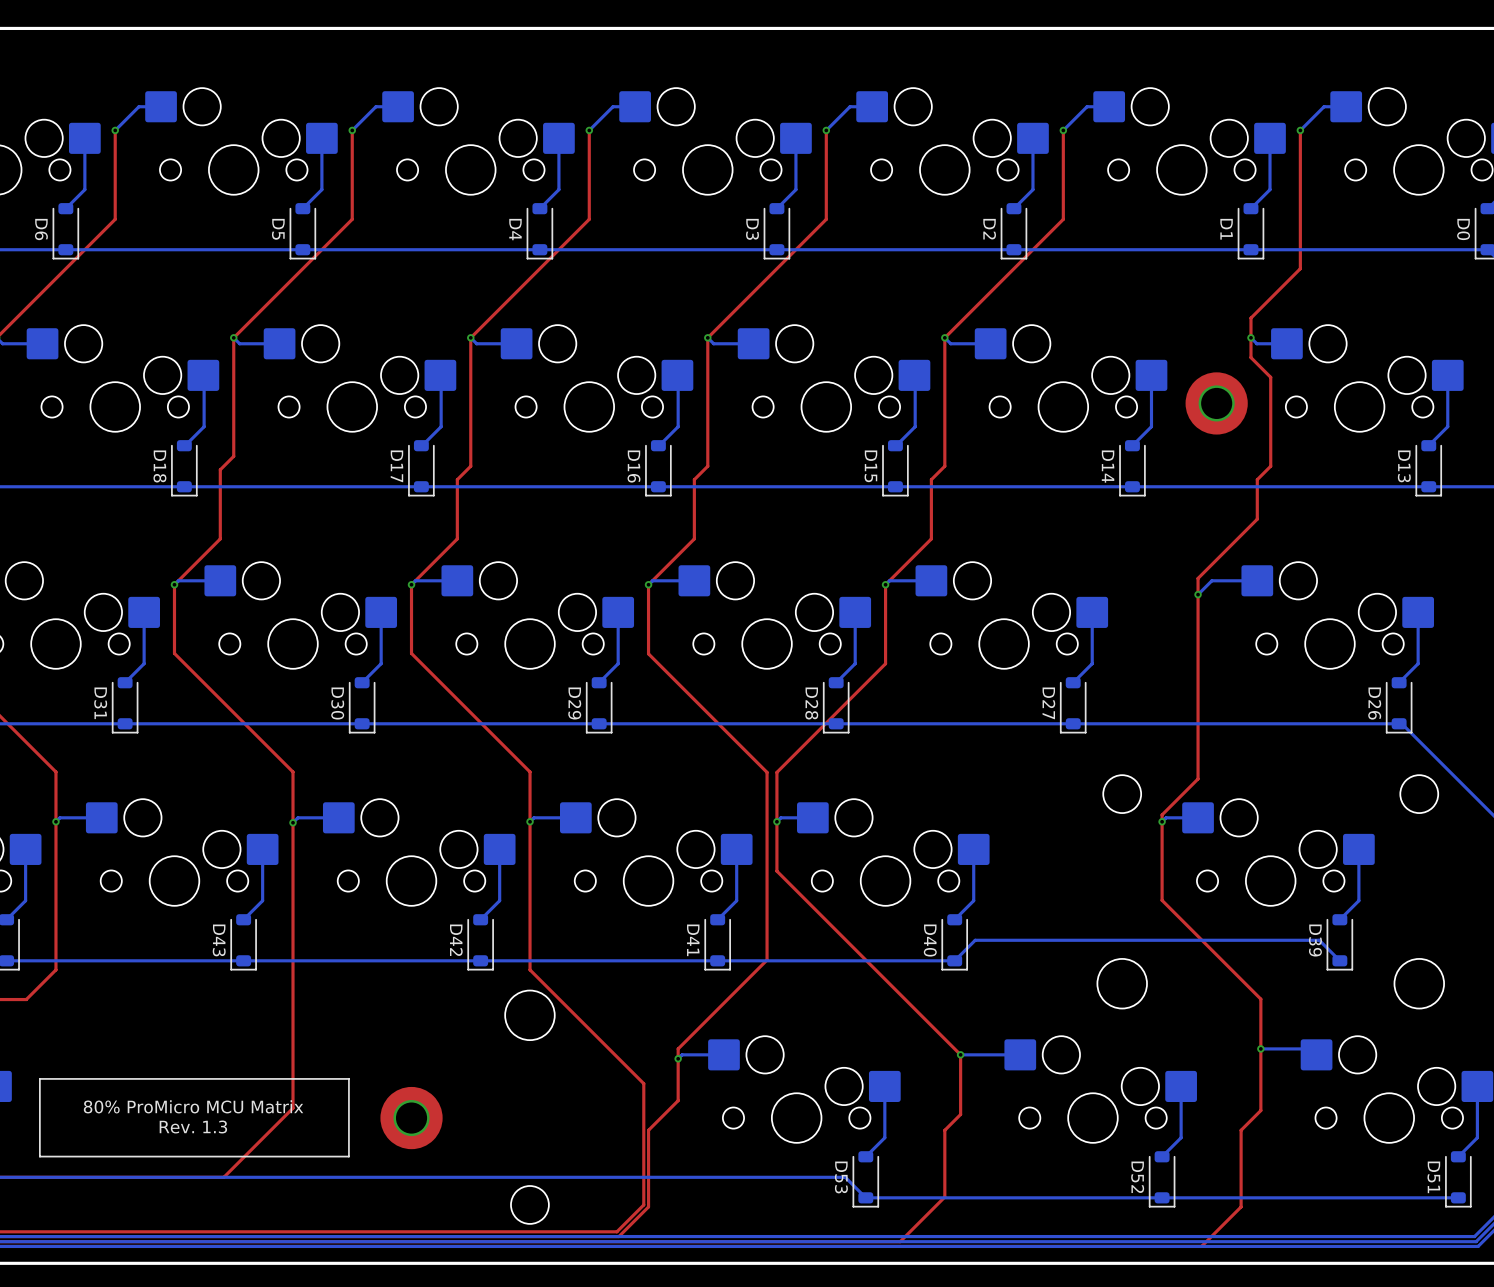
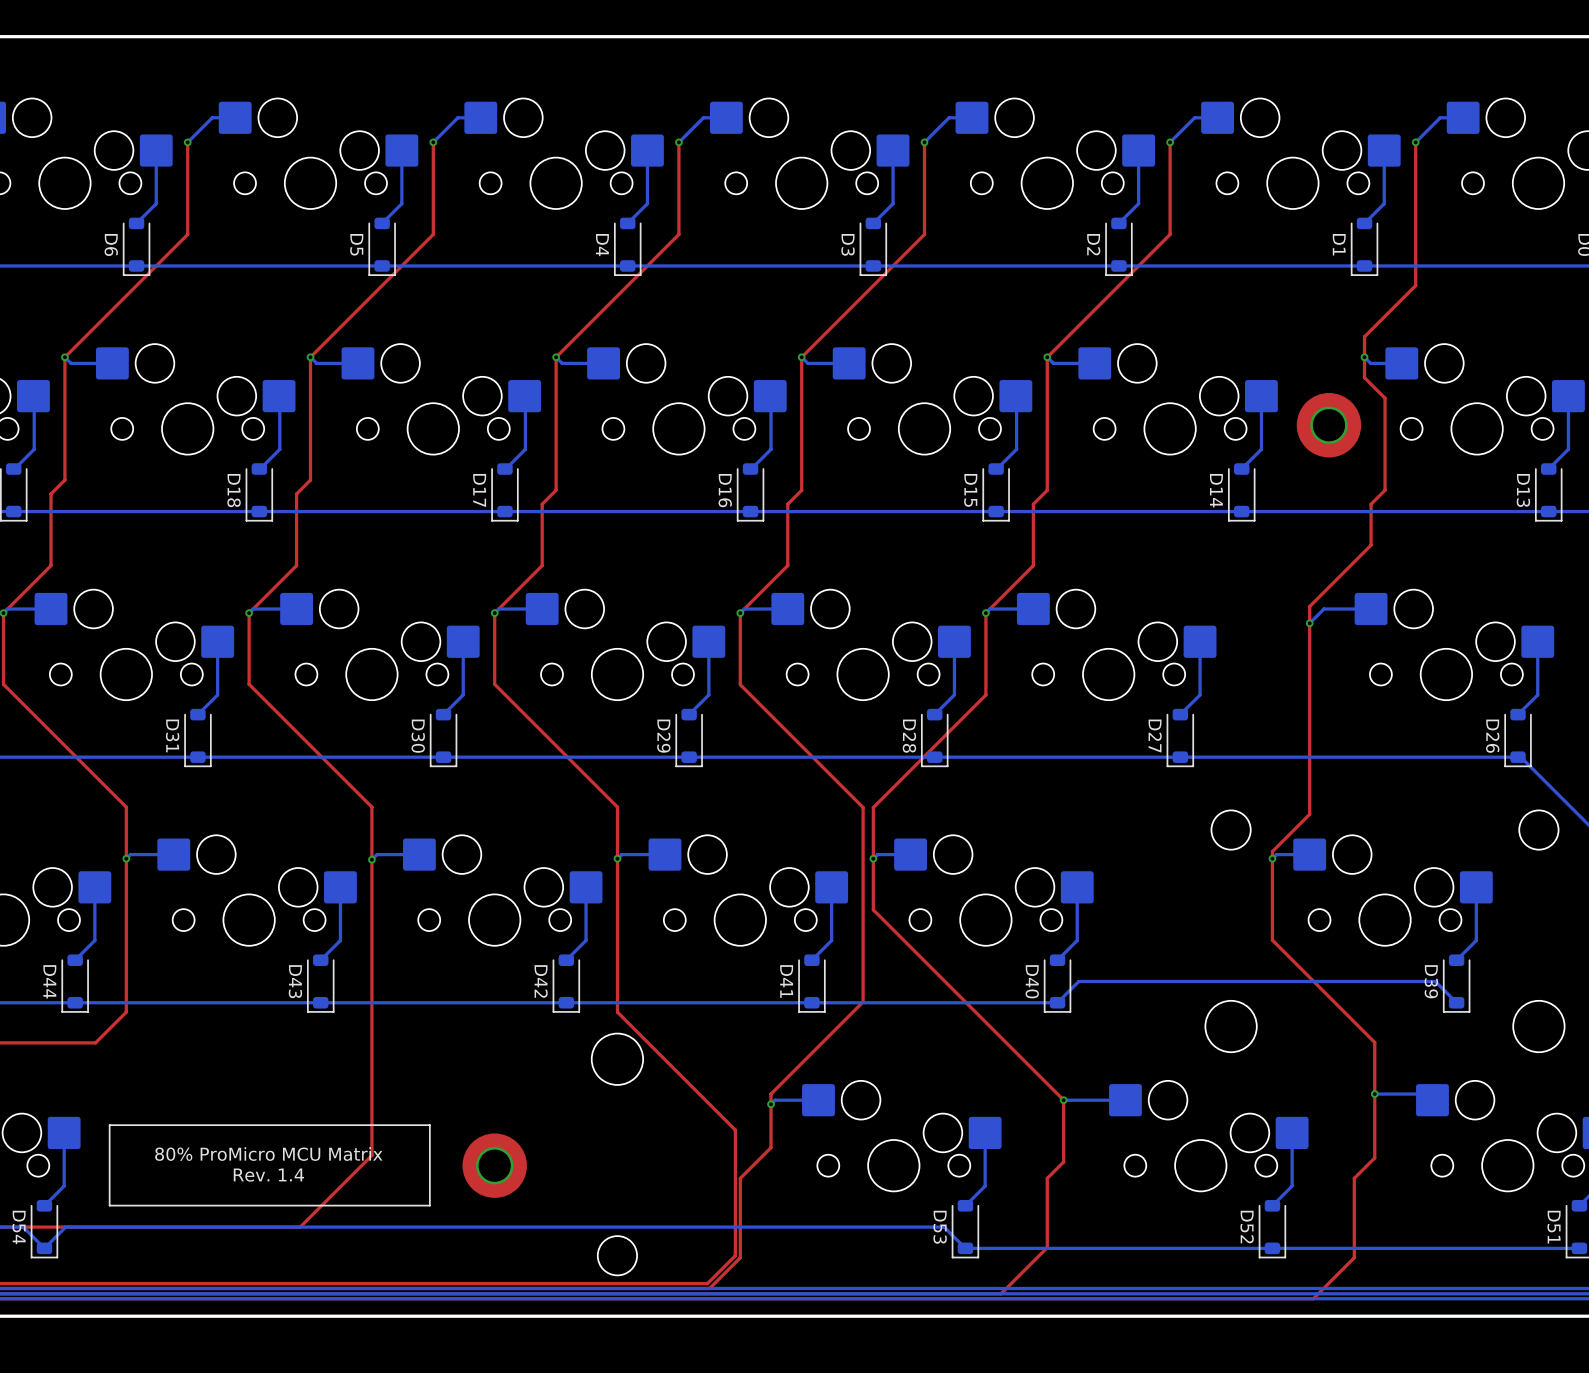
text: Rev. 1.3 (193, 1127) -> Rev. 1.4 (268, 1175)

